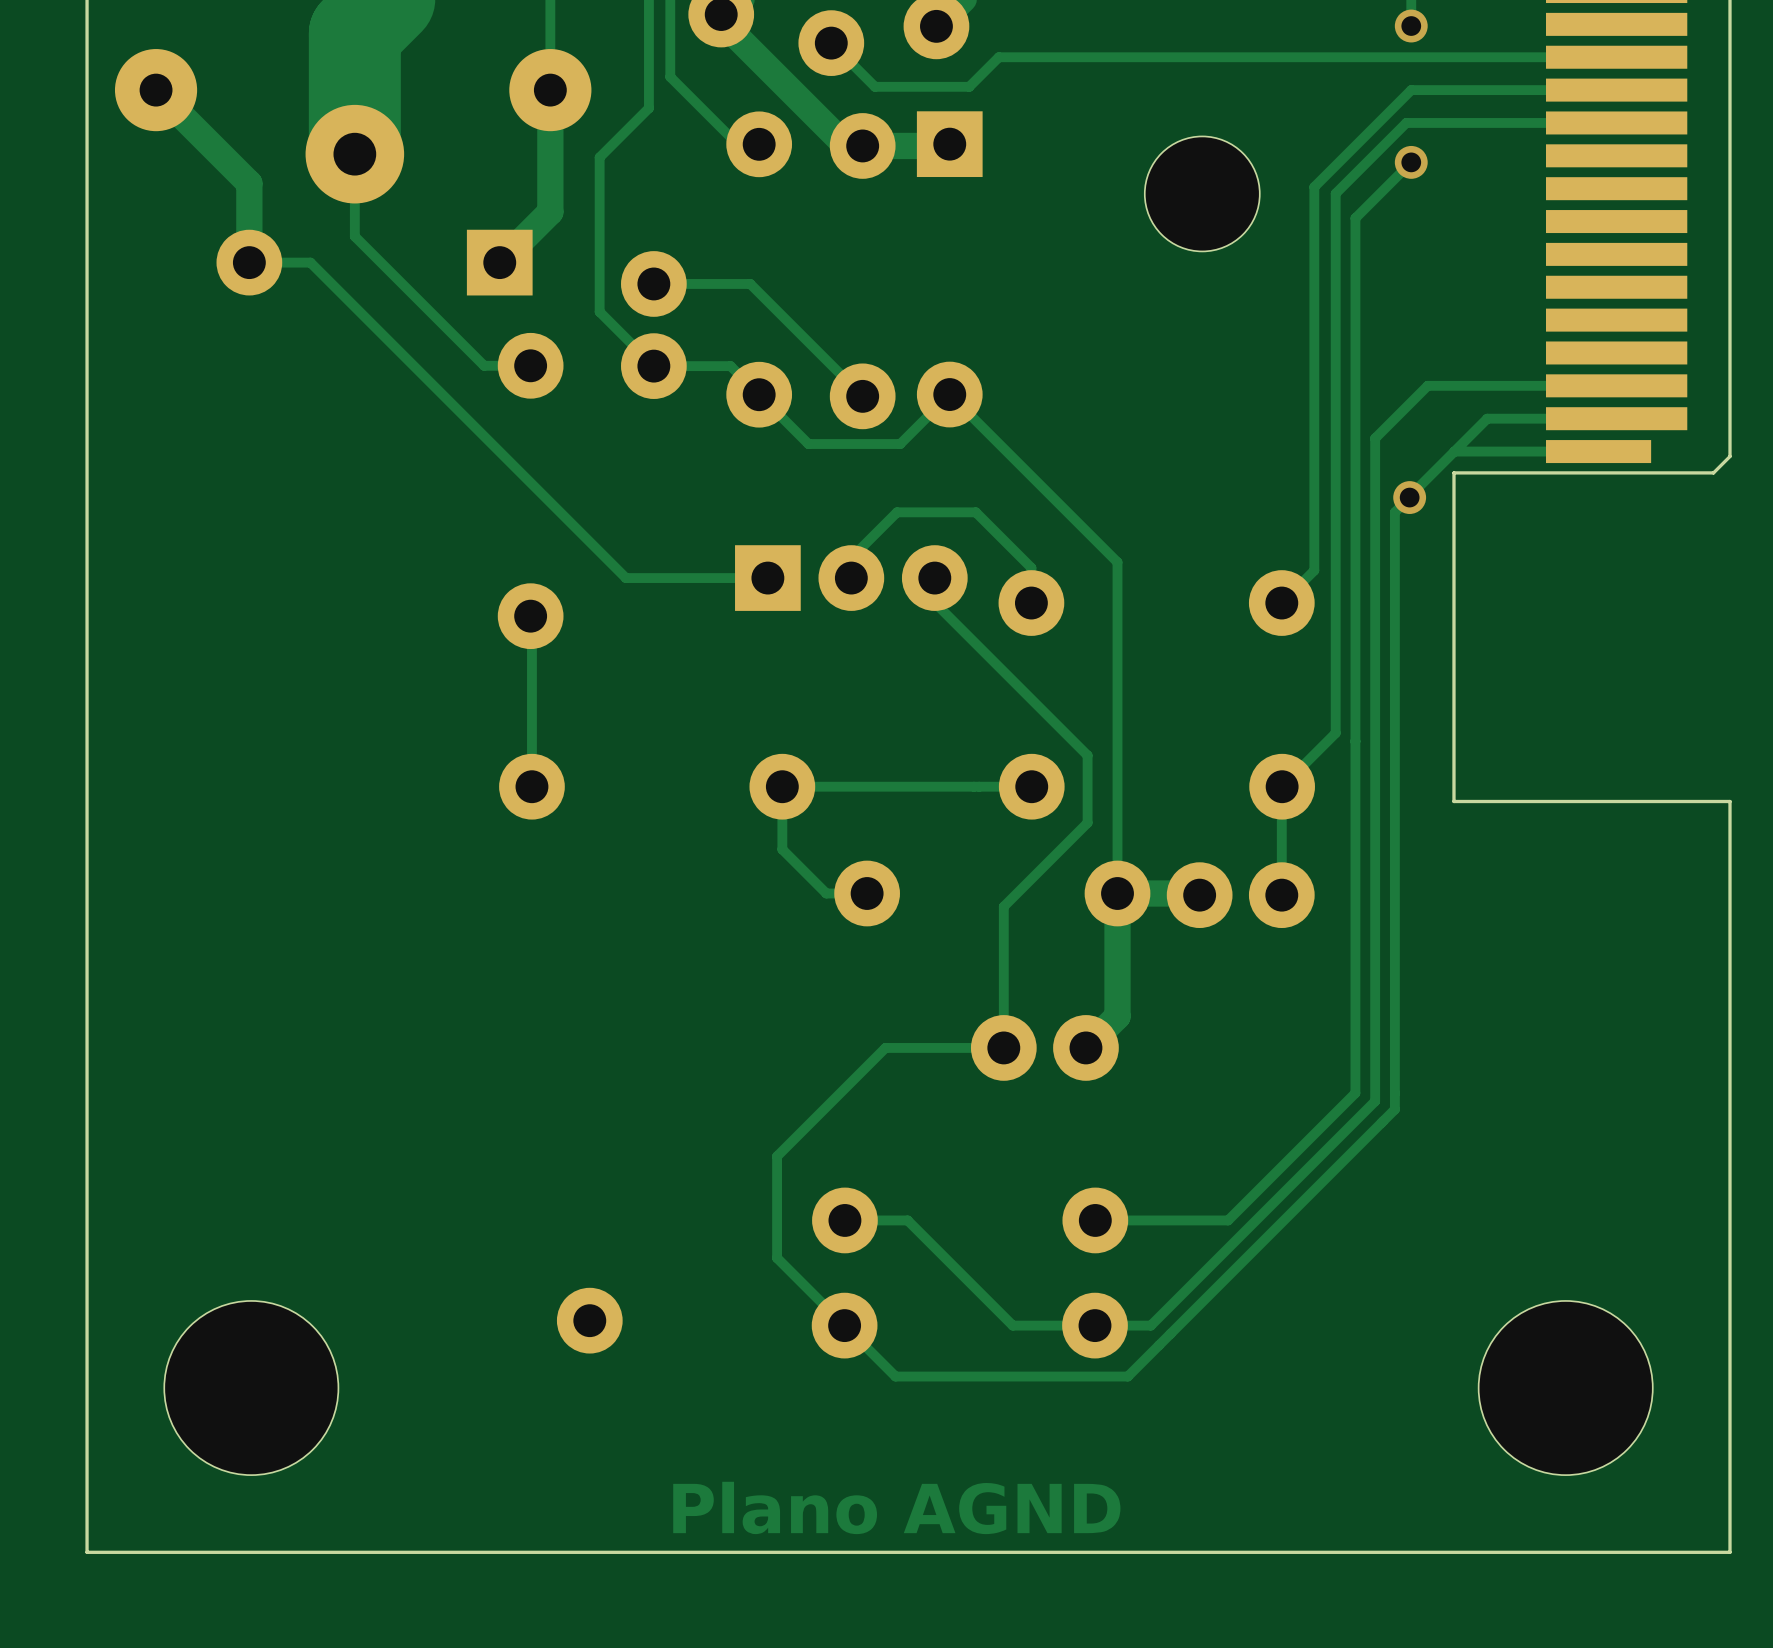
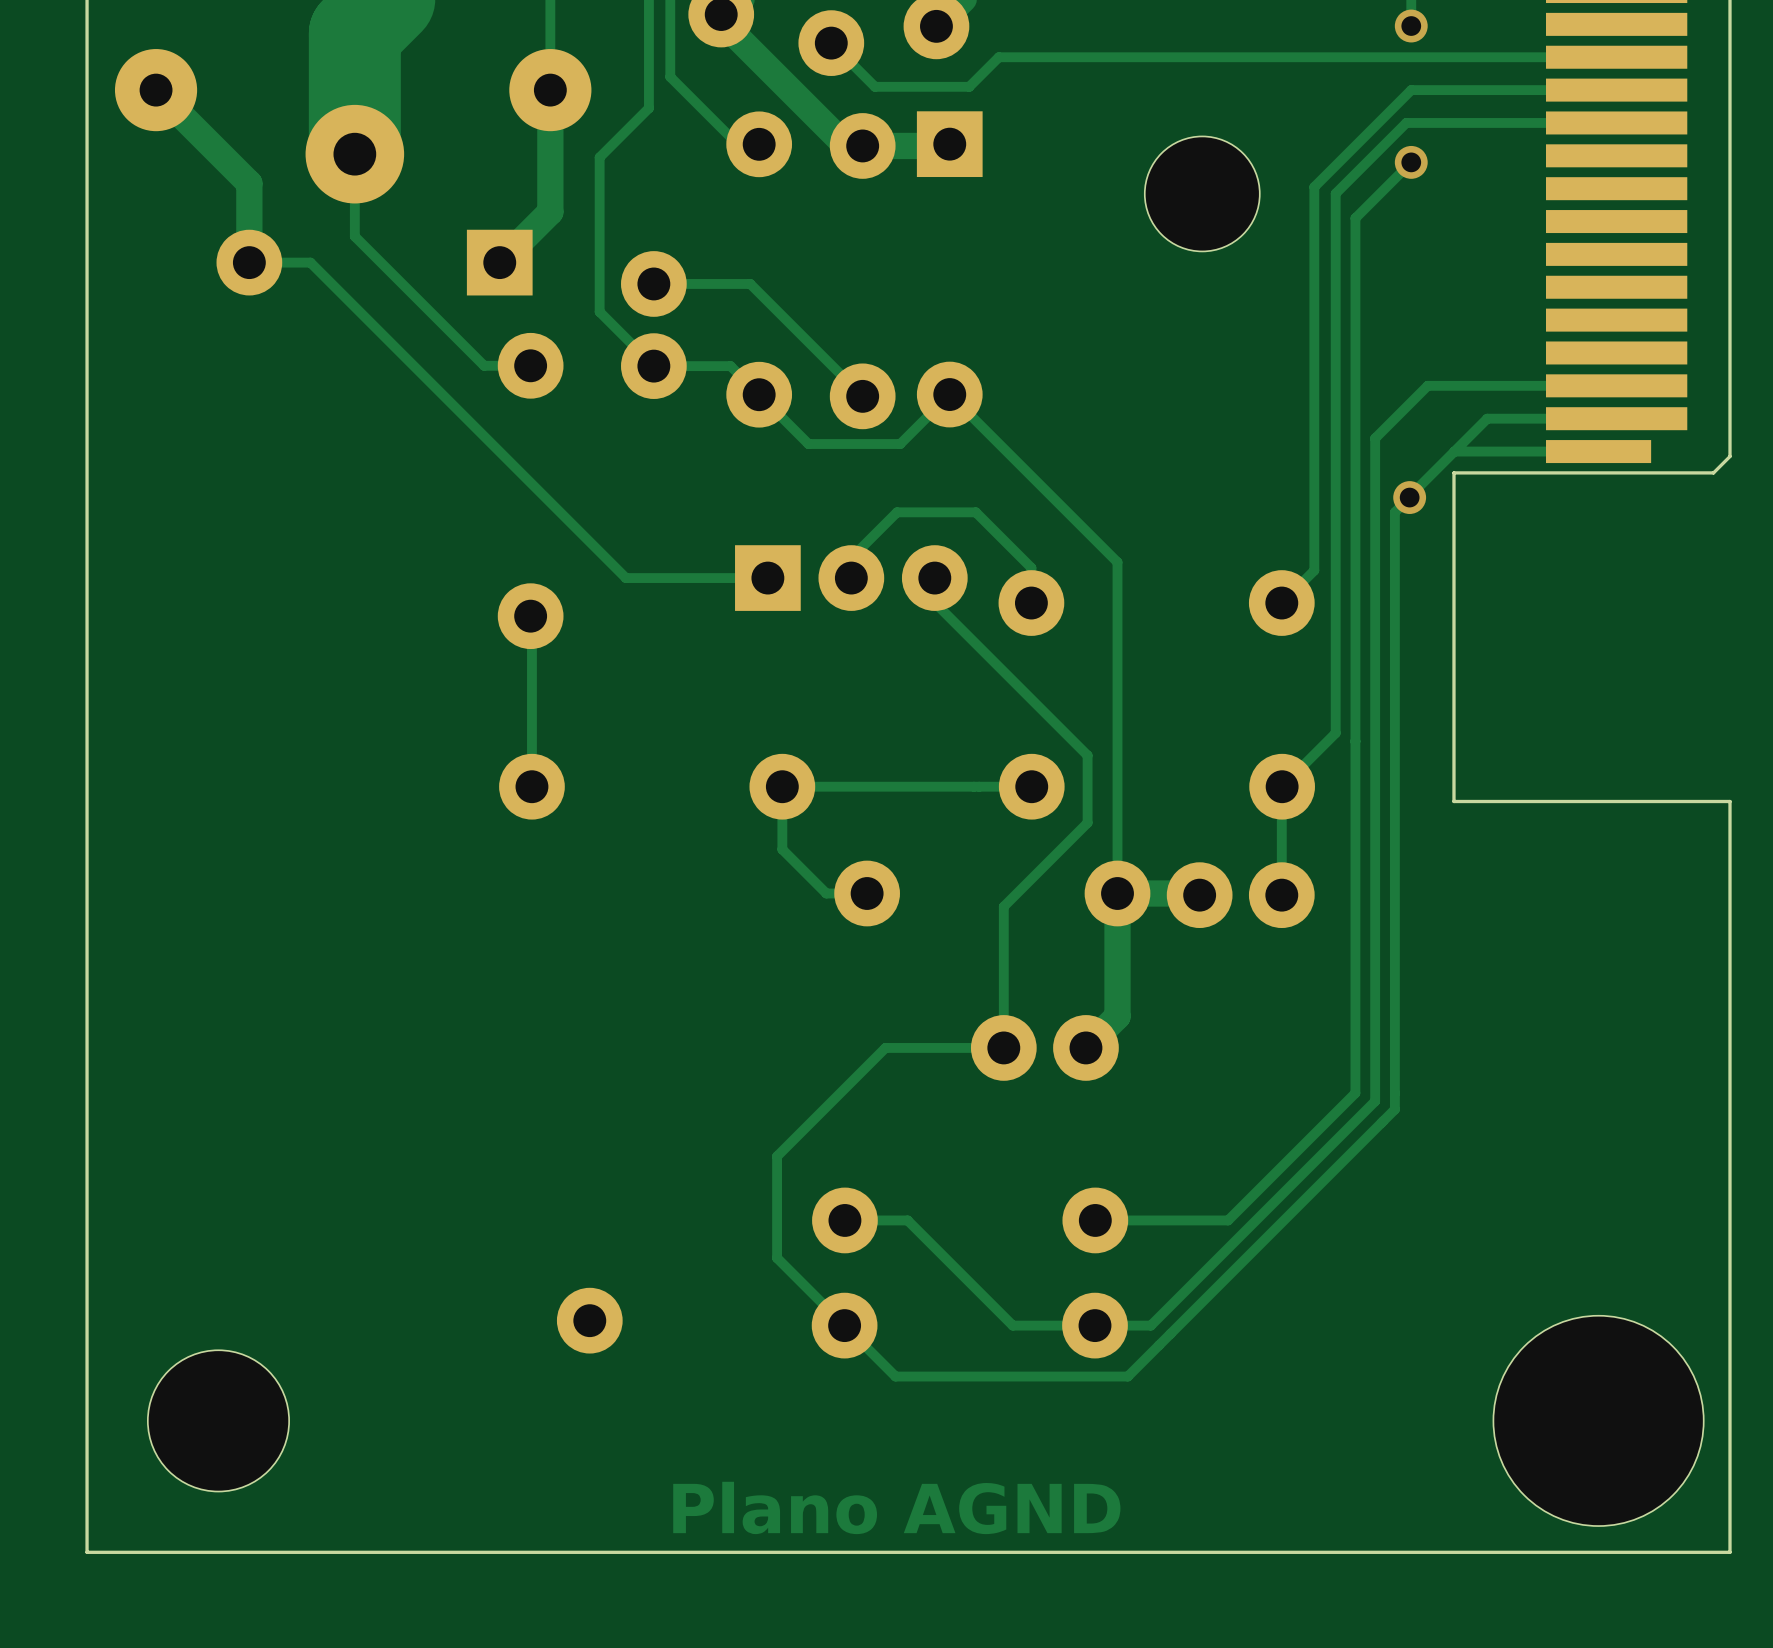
part: (251, 1388) -> none
part: (1565, 1388) -> none
part: none -> (218, 1420)
part: none -> (1598, 1420)

